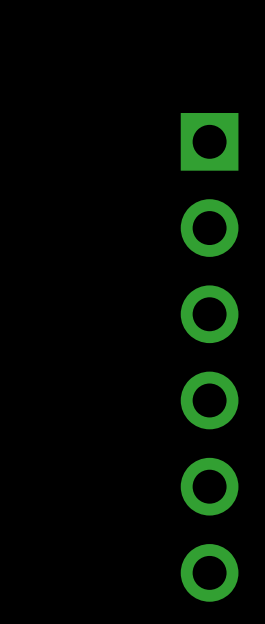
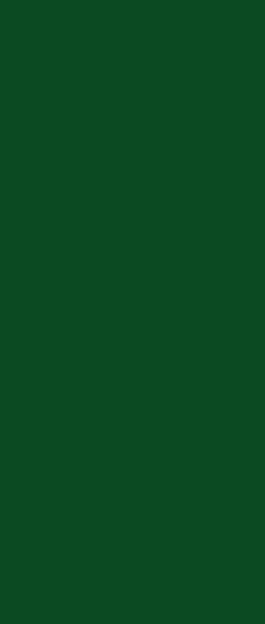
part: (209, 357) -> none

